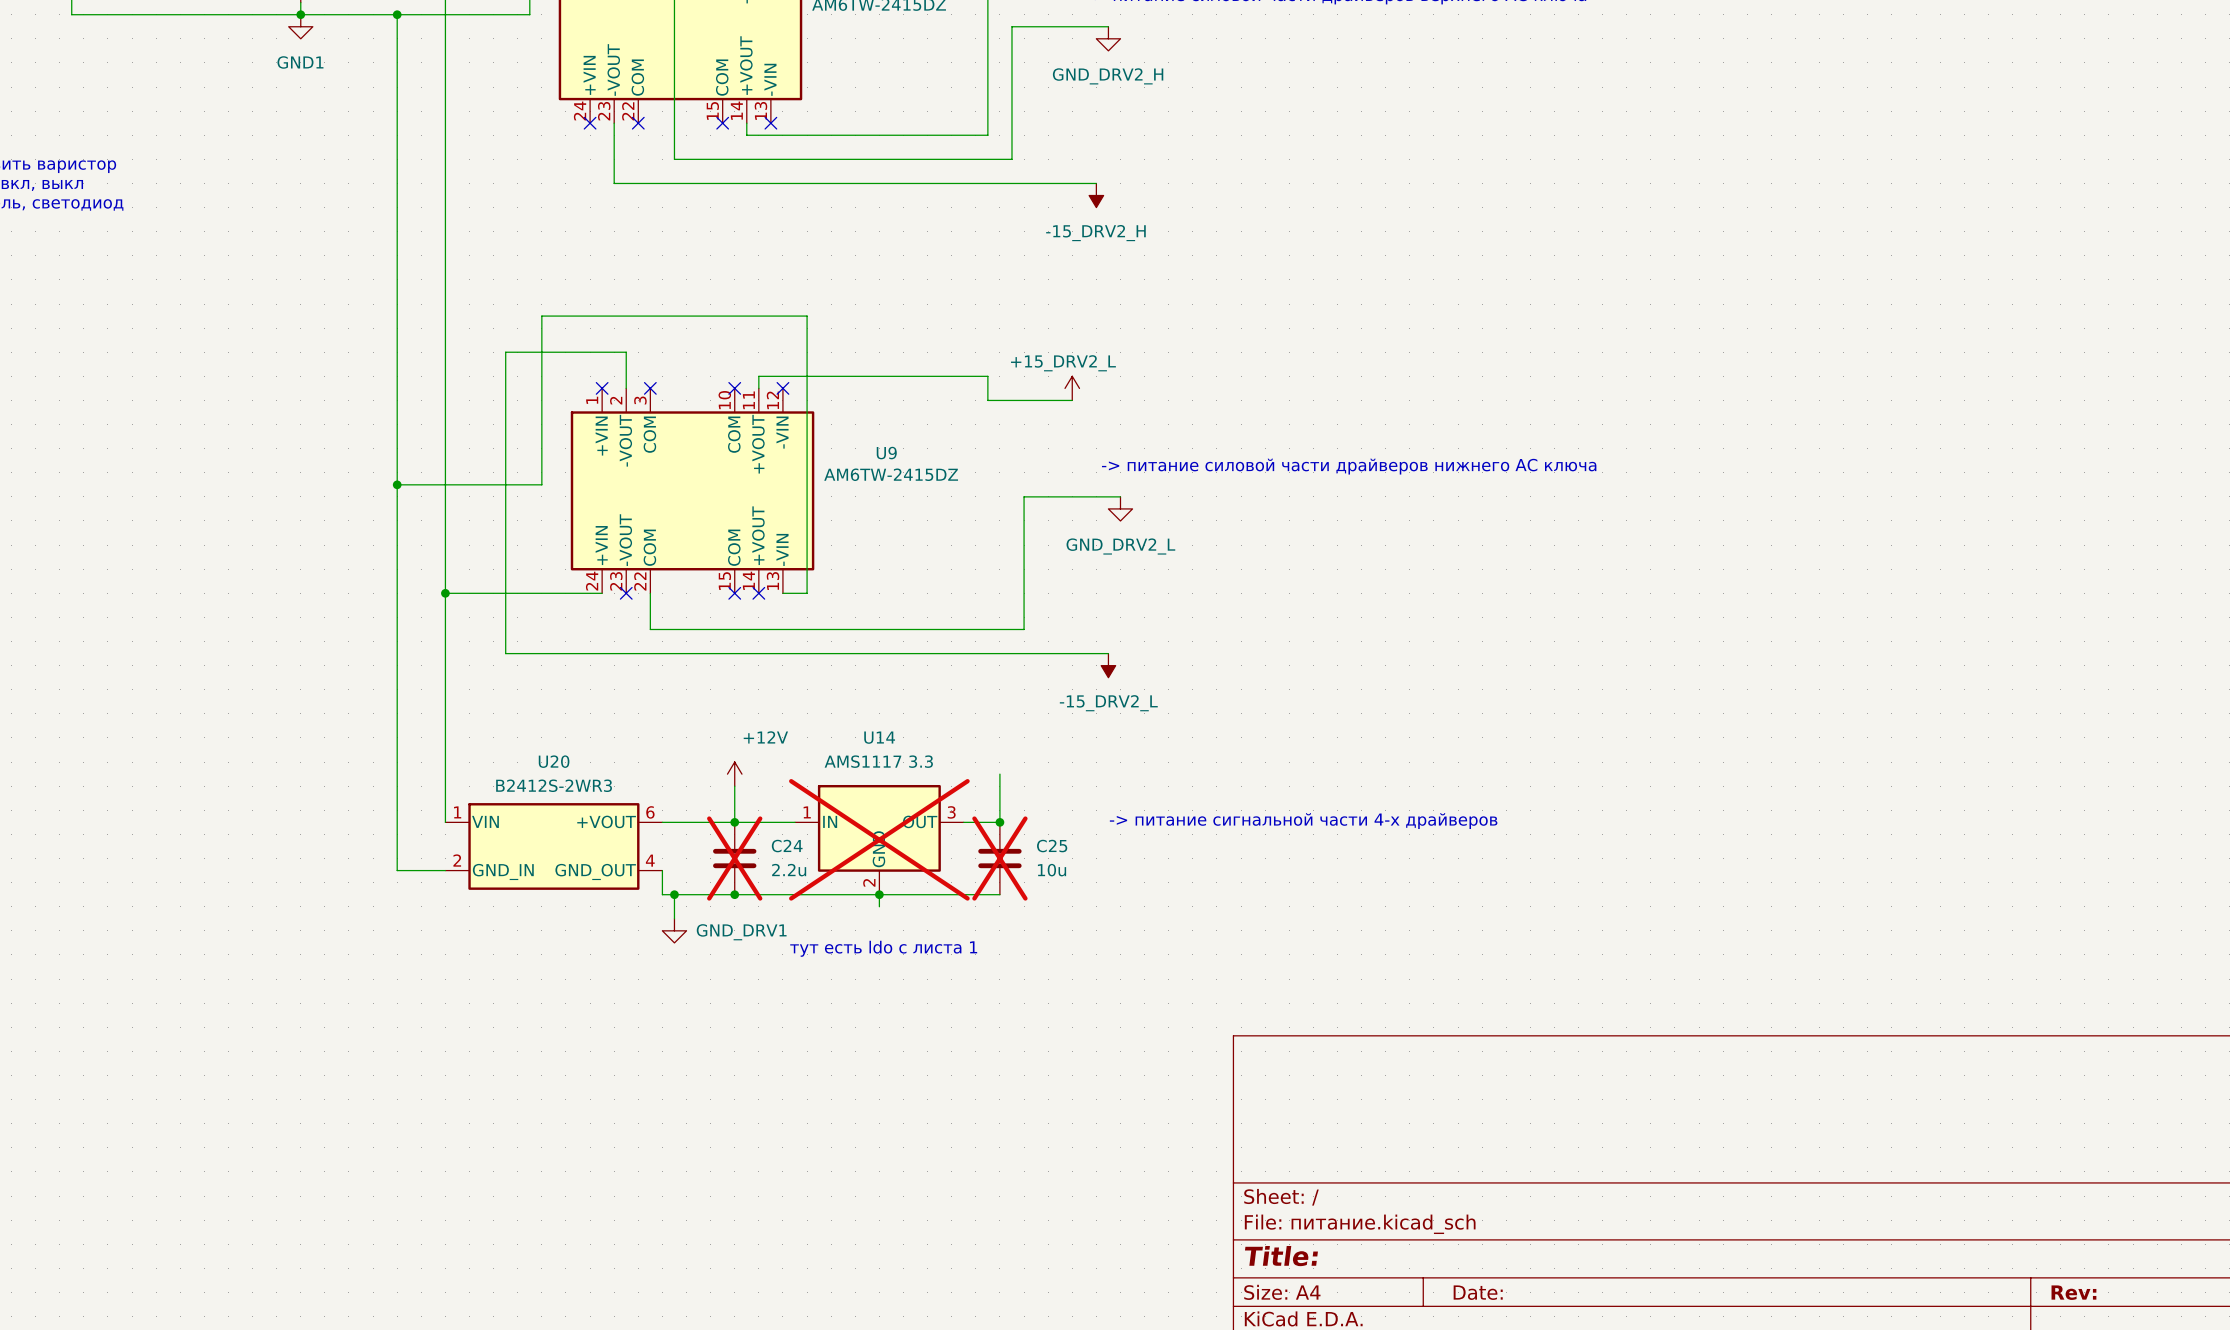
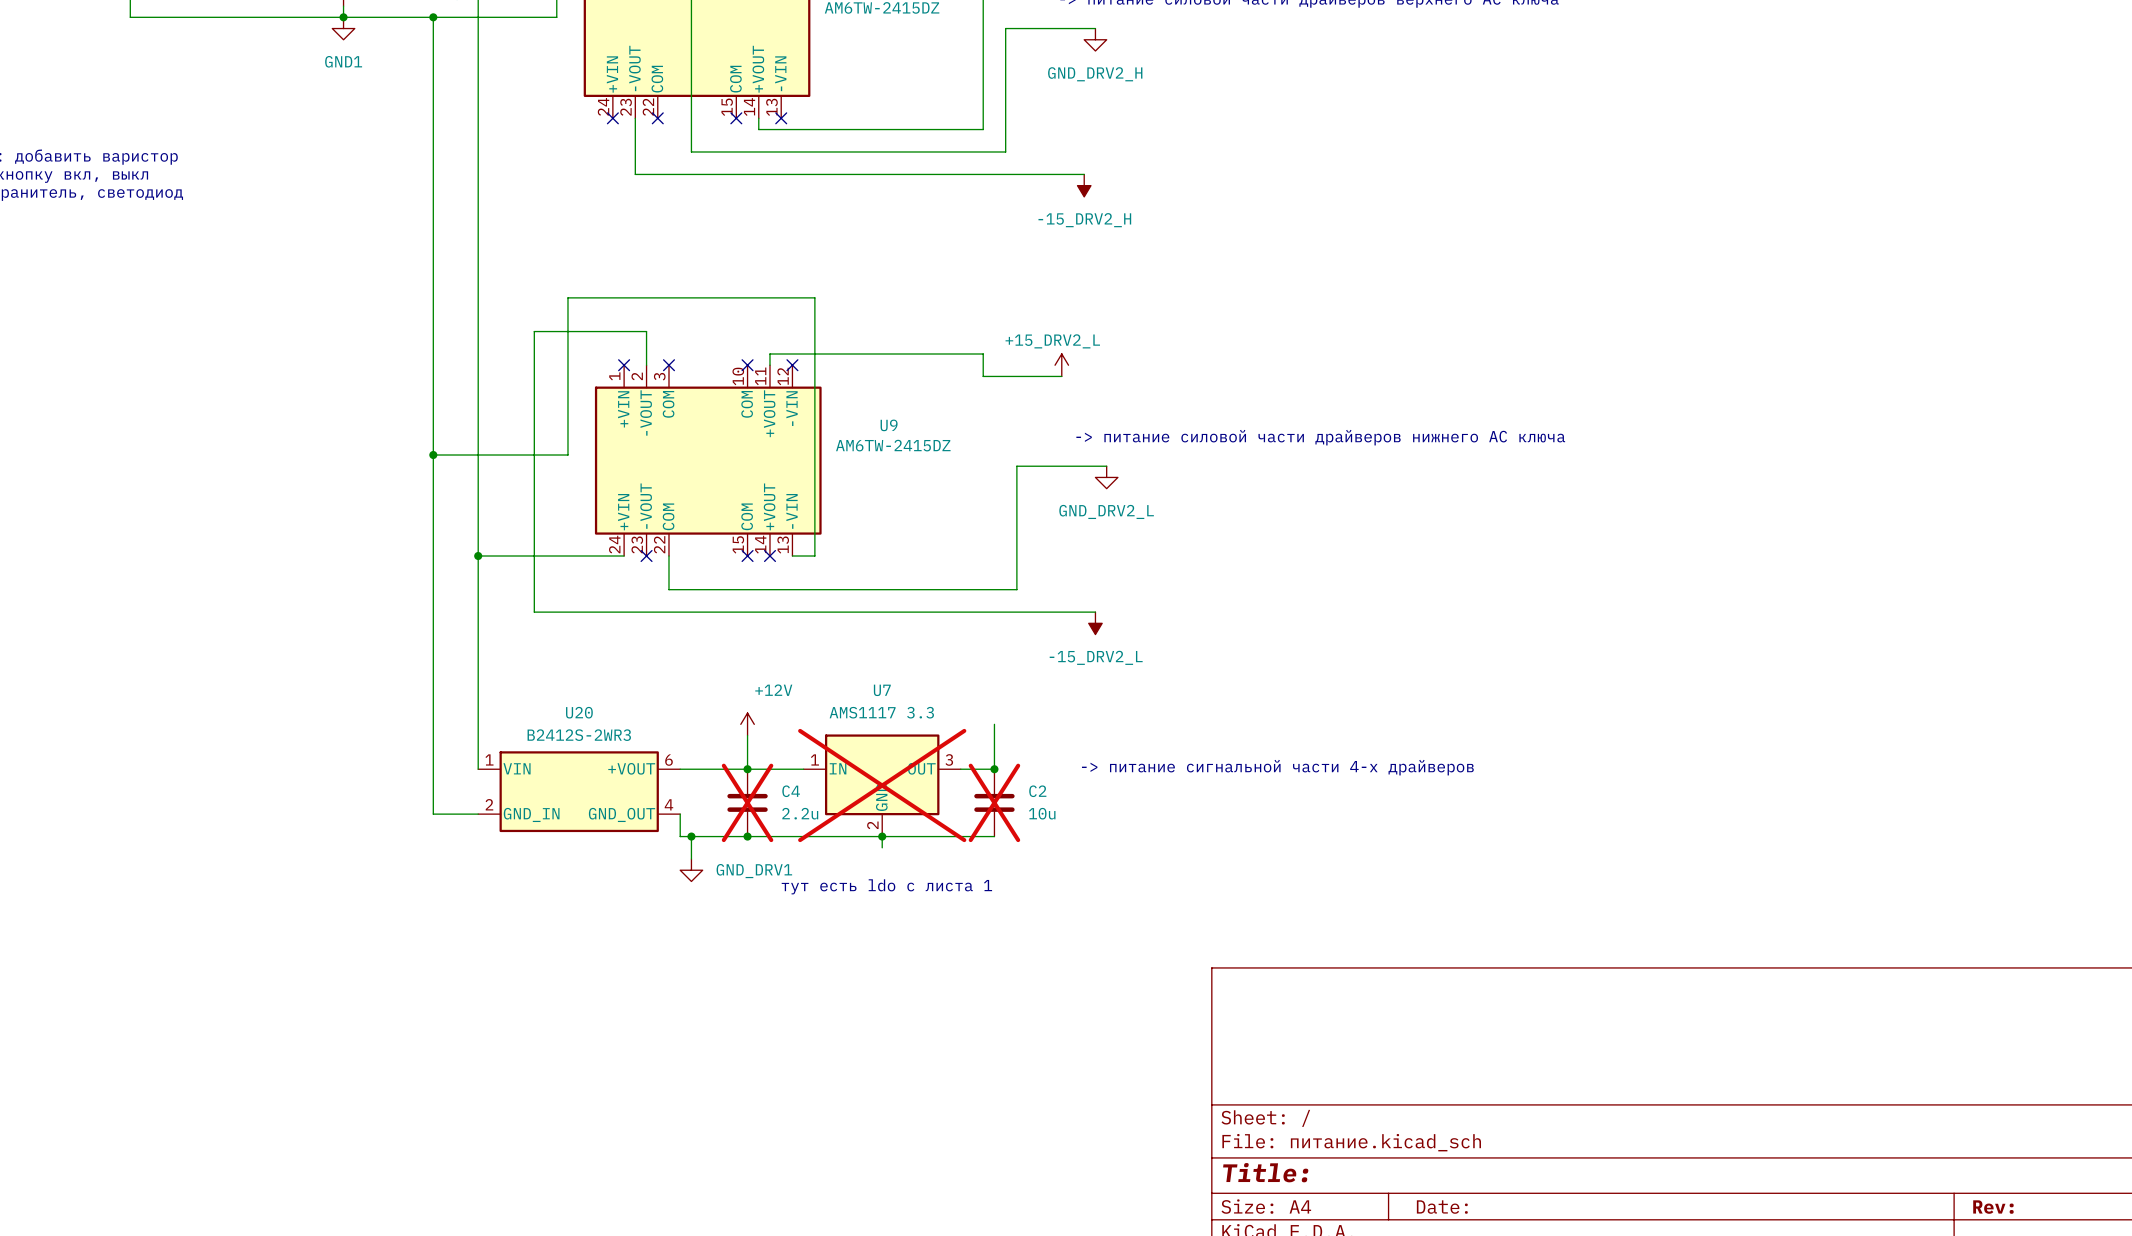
U14 name: U14 (879, 737) -> U7 (882, 690)
C24 name: C24 (787, 846) -> C4 (791, 791)
C25 name: C25 (1052, 846) -> C2 (1037, 791)

